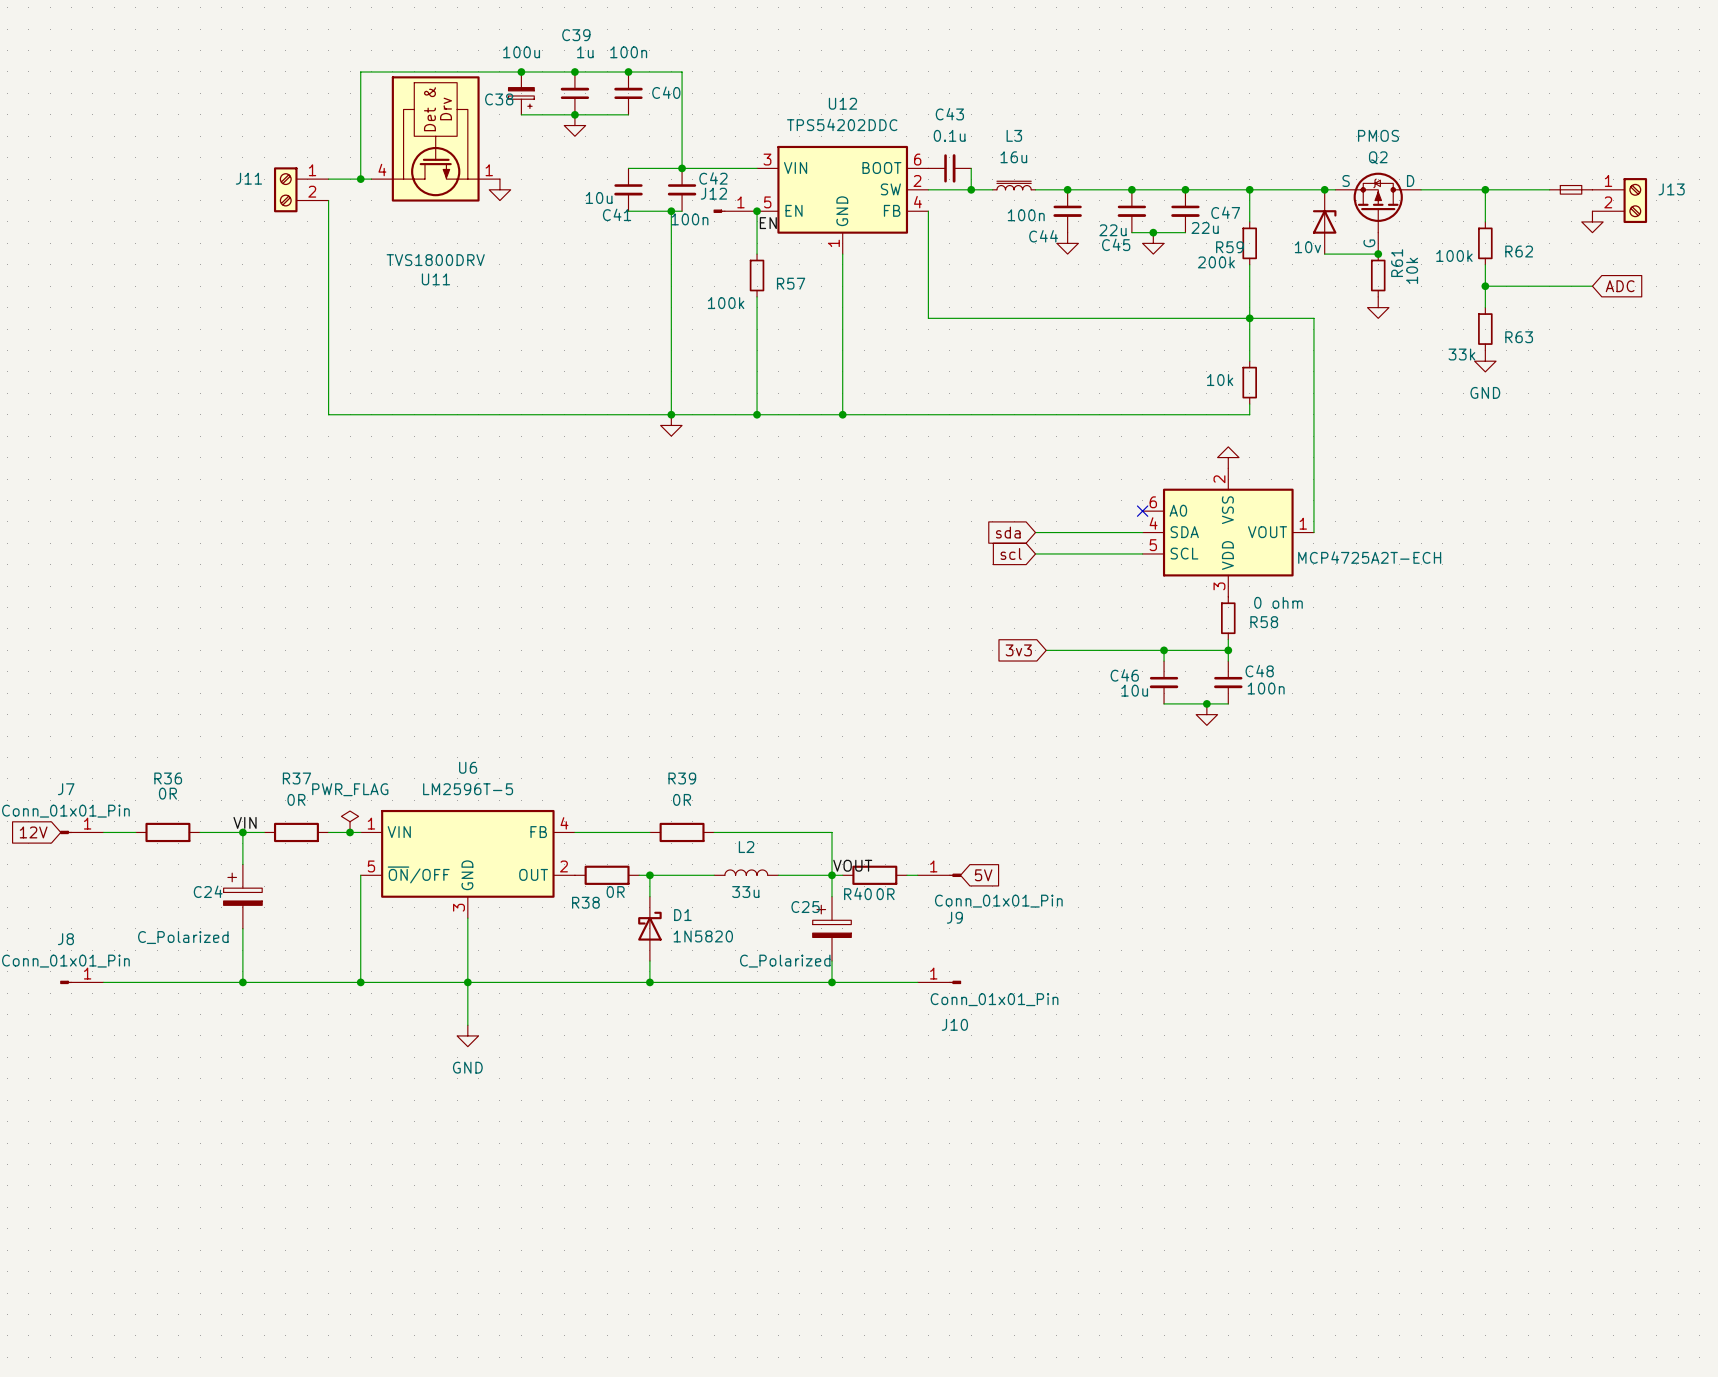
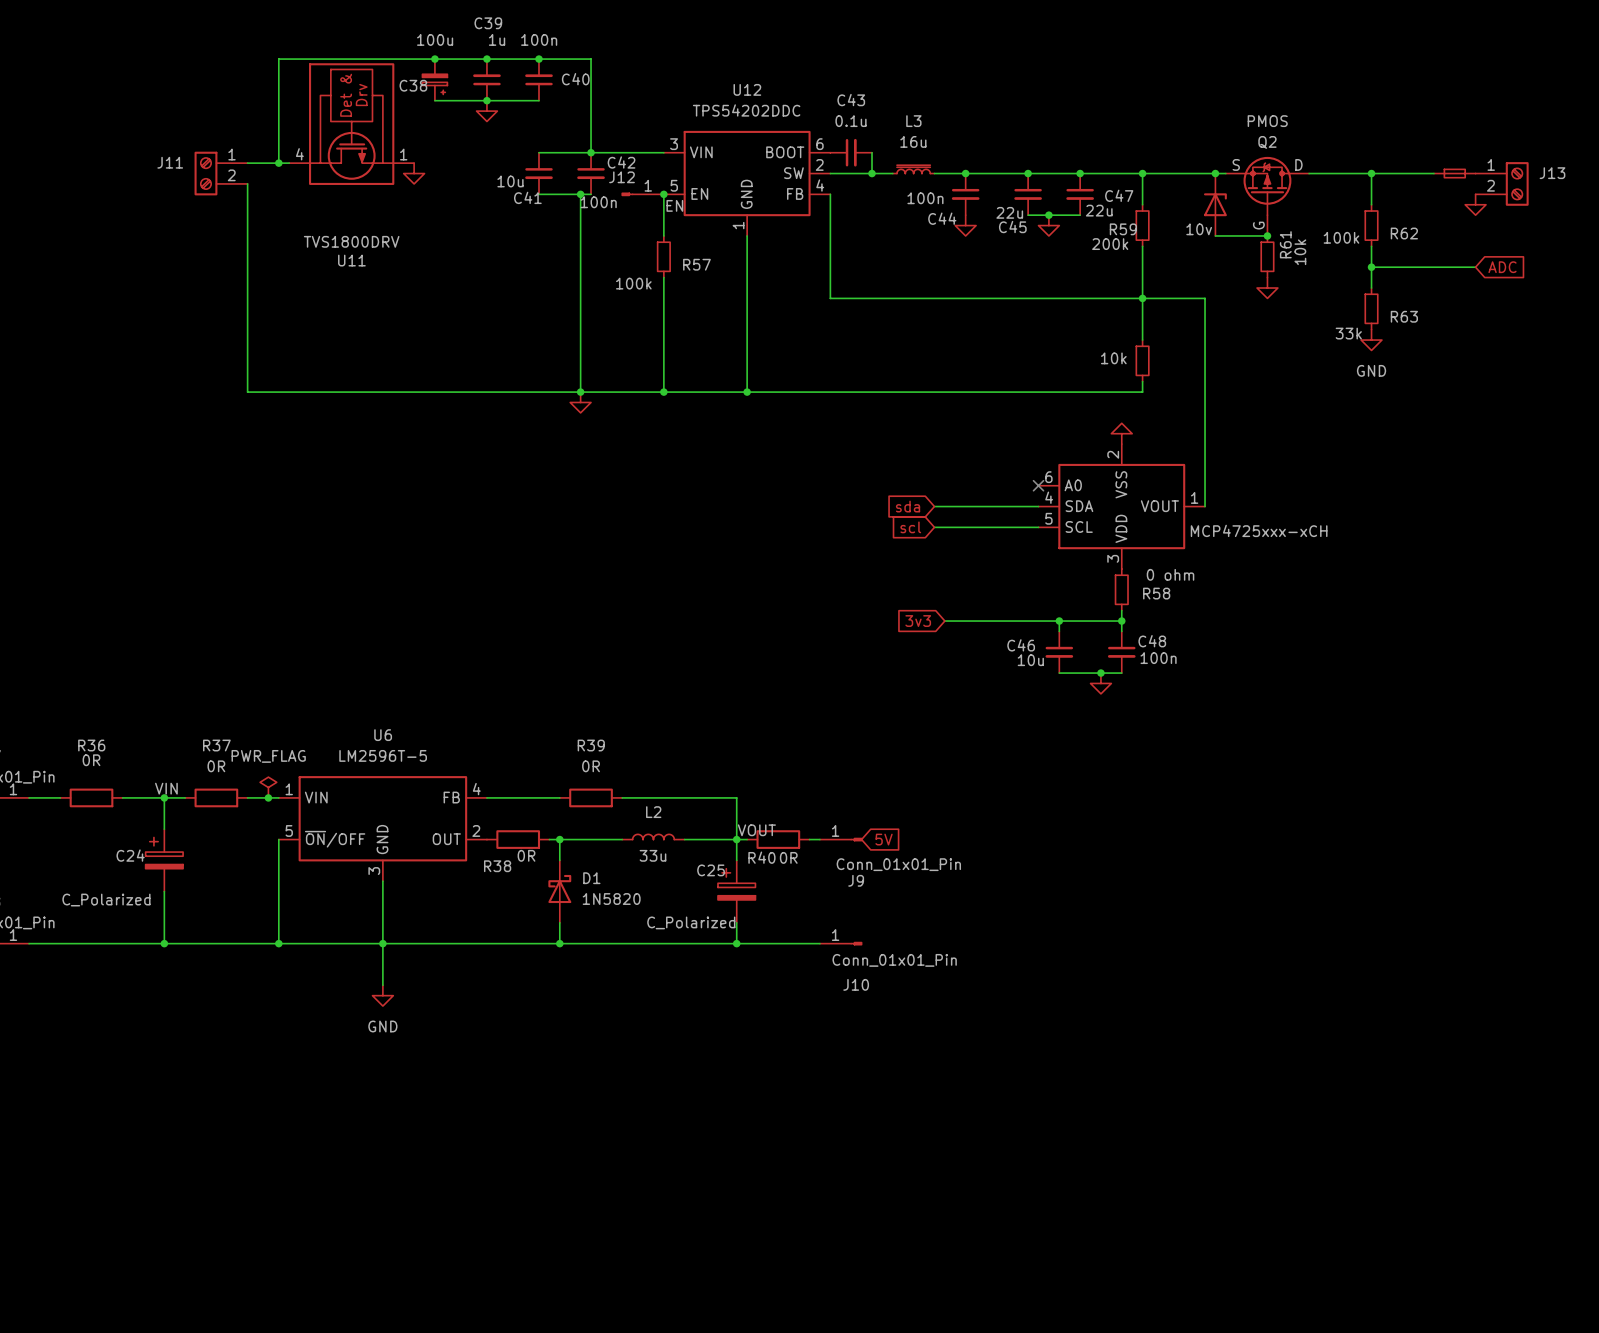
part value: MCP4725A2T-ECH (1369, 557) -> MCP4725xxx-xCH (1259, 530)

